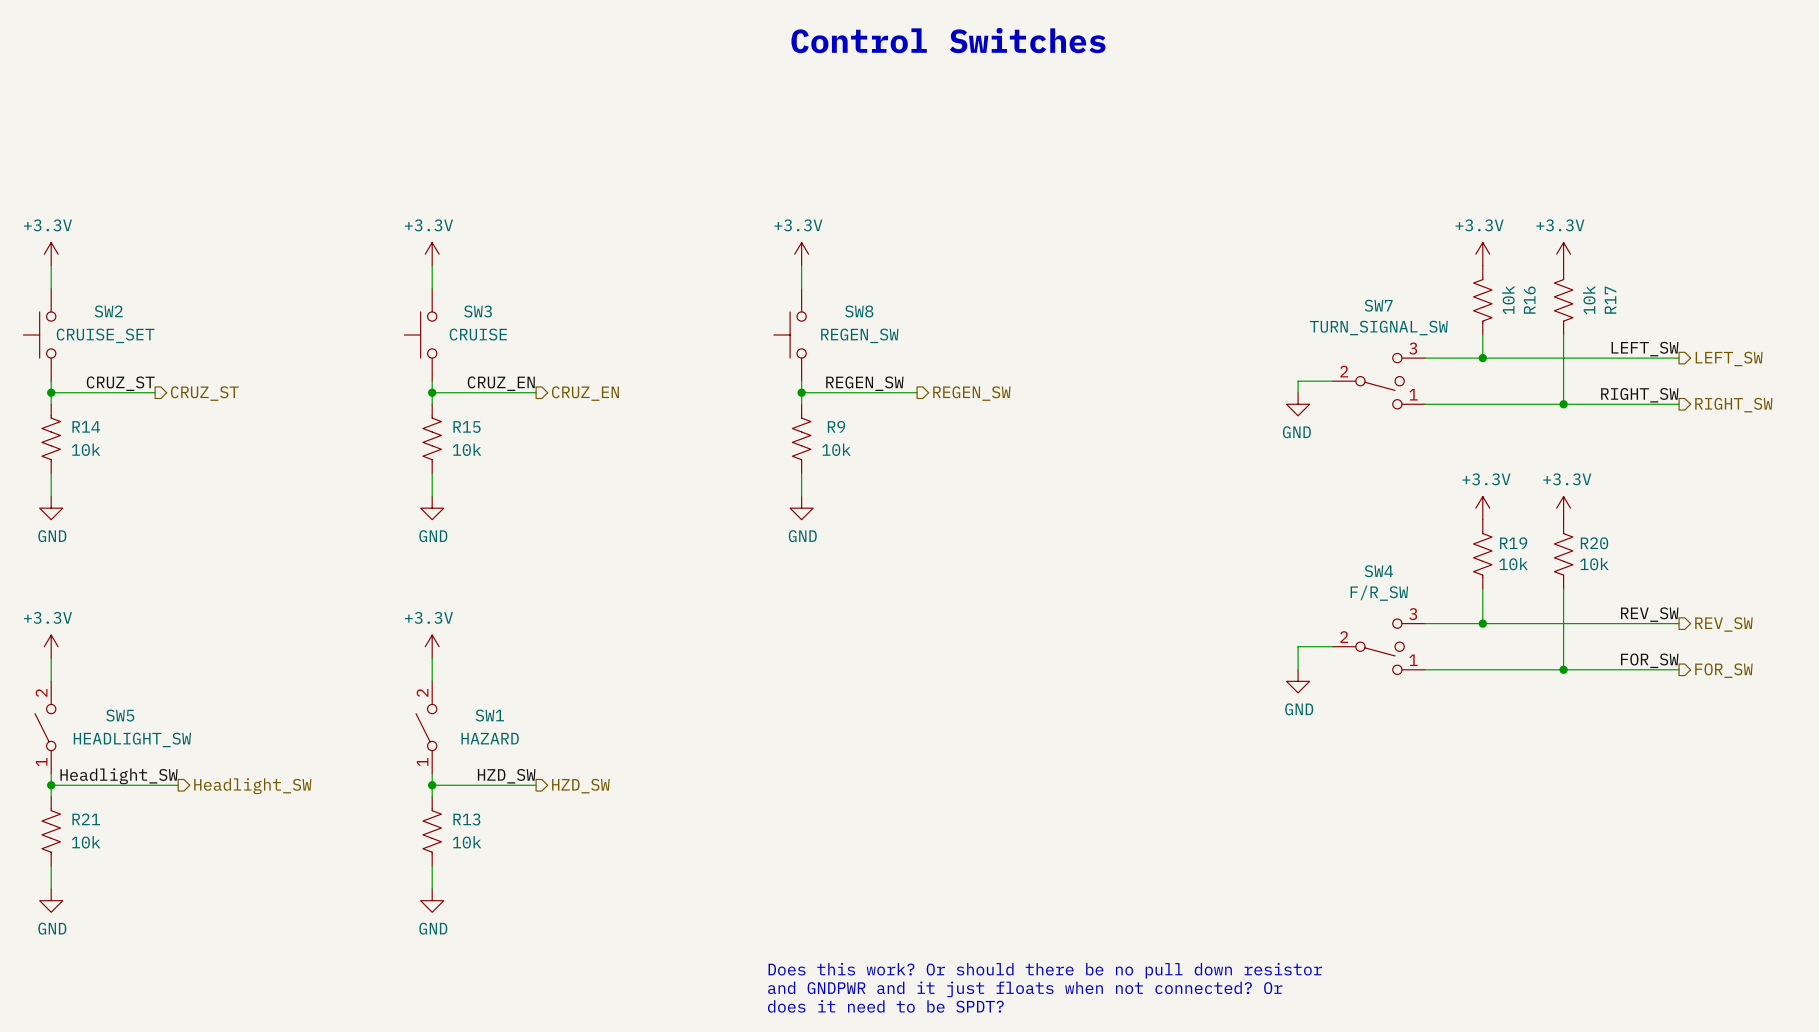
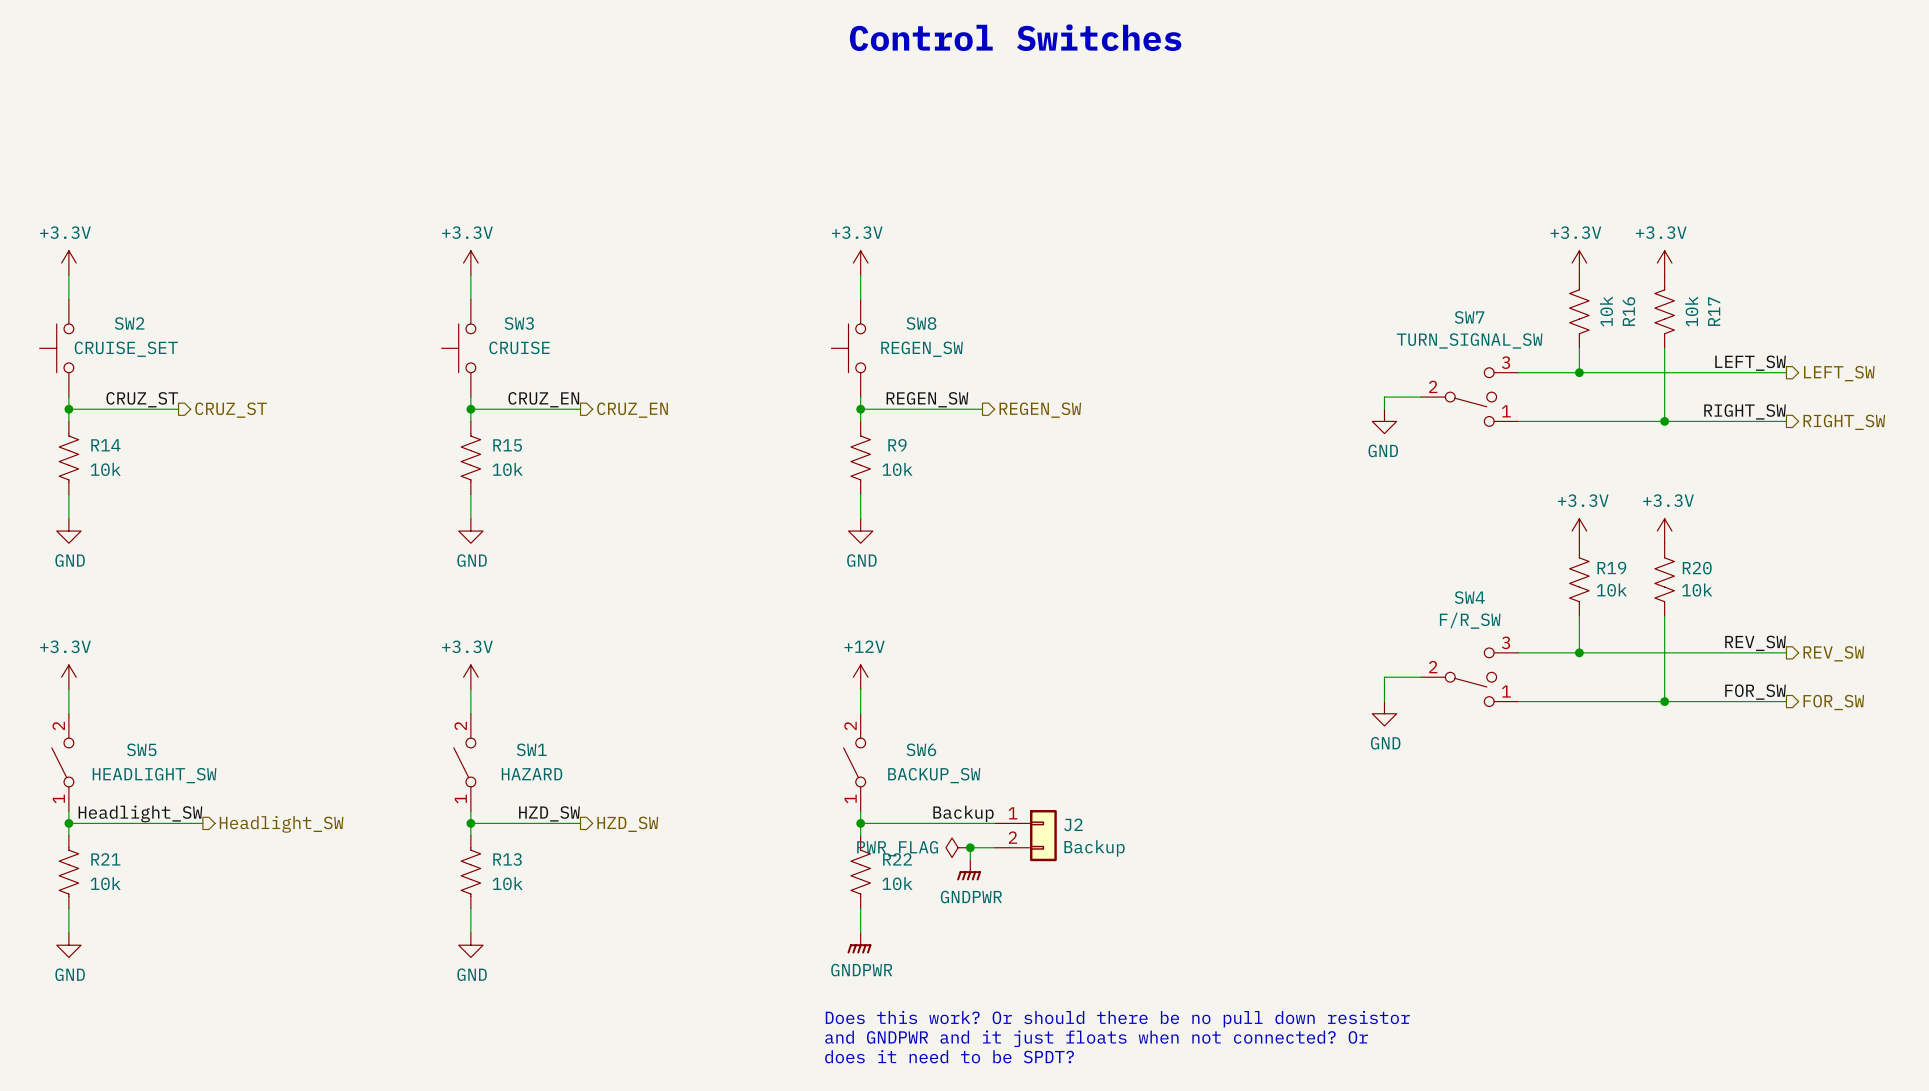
power symbol: none -> +12V (860, 677)
wire: none -> (860, 689) (860, 713)
SW6: none -> BACKUP_SW (854, 762)
wire: none -> (860, 811) (860, 835)
label: none -> Backup (963, 813)
wire: none -> (860, 823) (994, 823)
junction: none -> (860, 823)
J2: none -> Backup (1025, 835)
power symbol: none -> PWR_FLAG (958, 847)
junction: none -> (970, 847)
wire: none -> (994, 847) (970, 847) (970, 859)
power symbol: none -> GNDPWR (969, 870)
R22: none -> 10k (860, 872)
wire: none -> (860, 908) (860, 933)
power symbol: none -> GNDPWR (859, 943)

